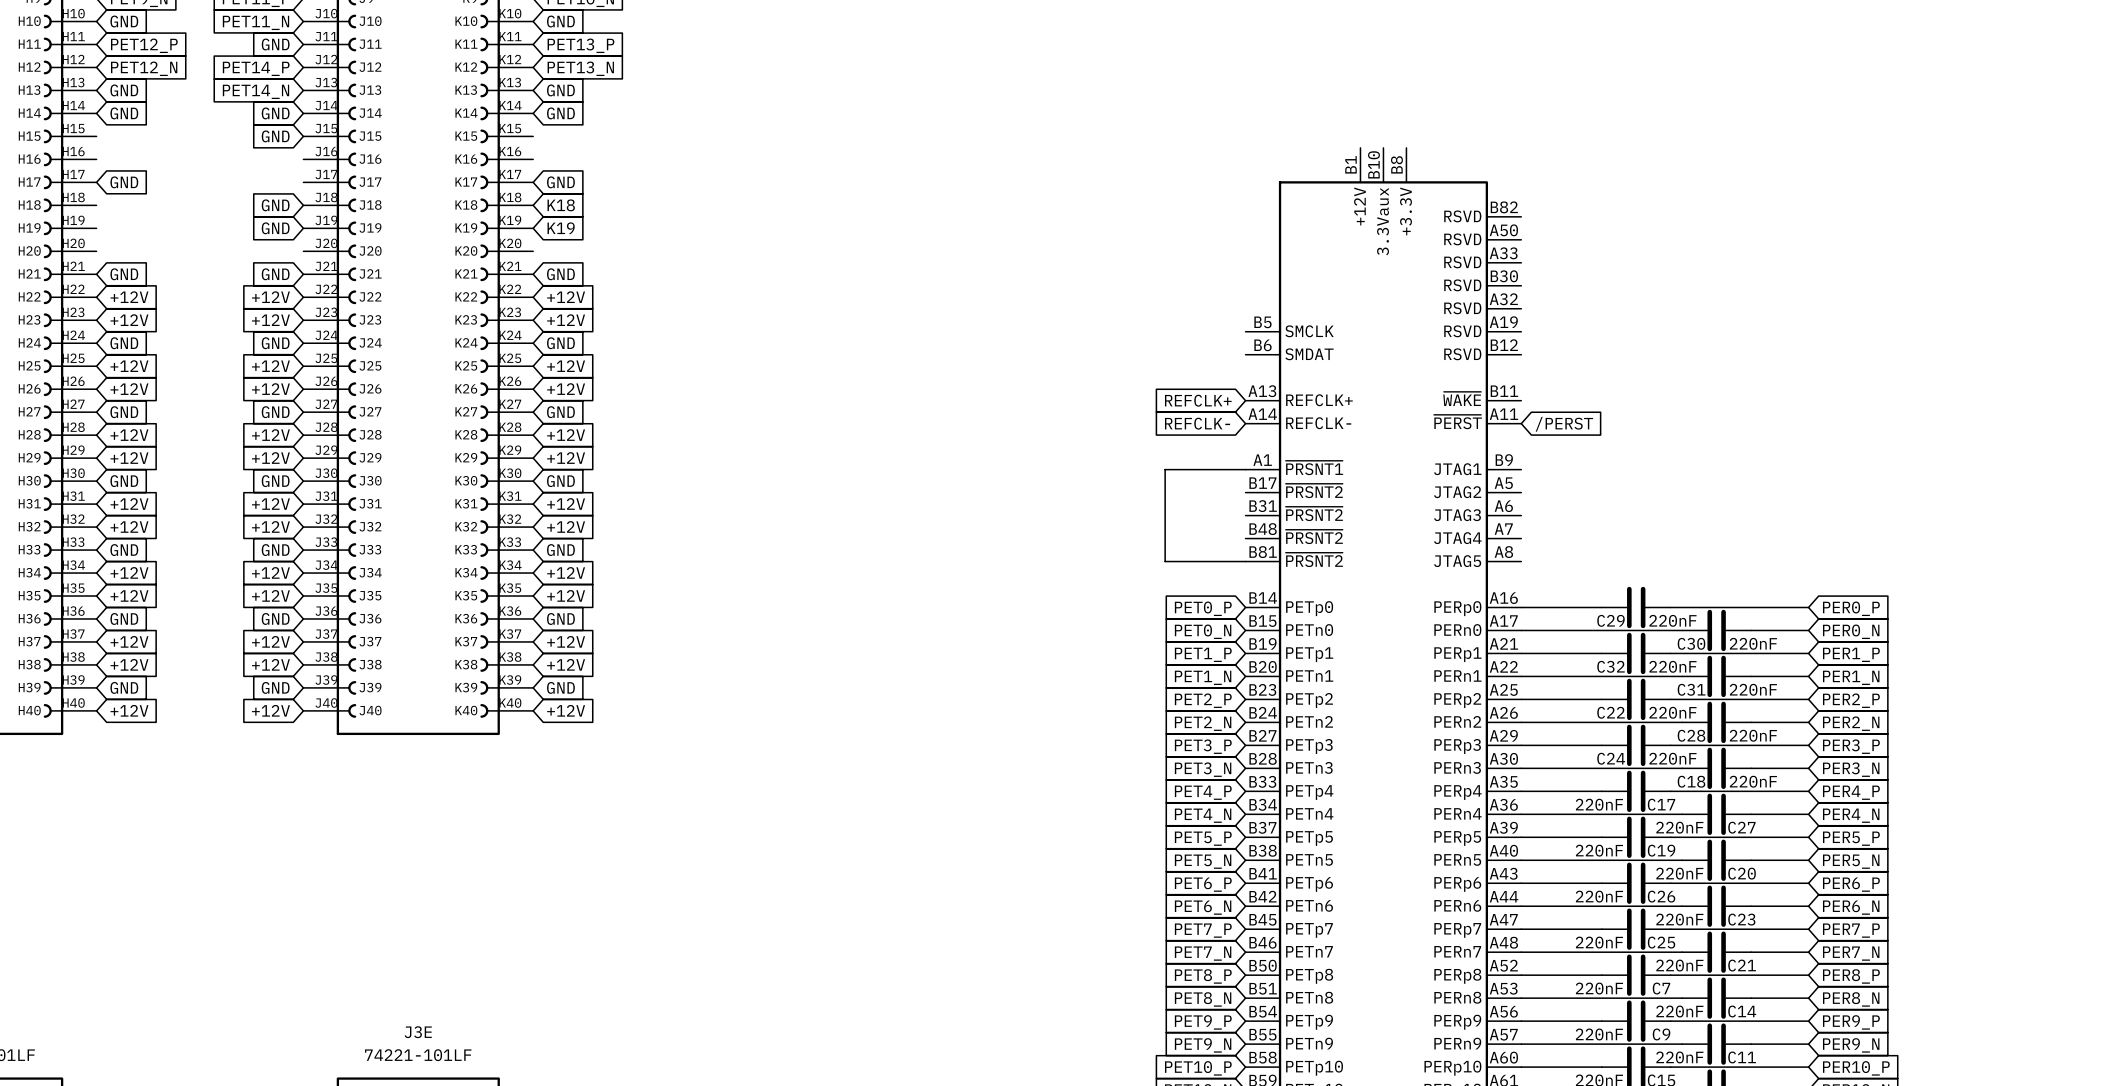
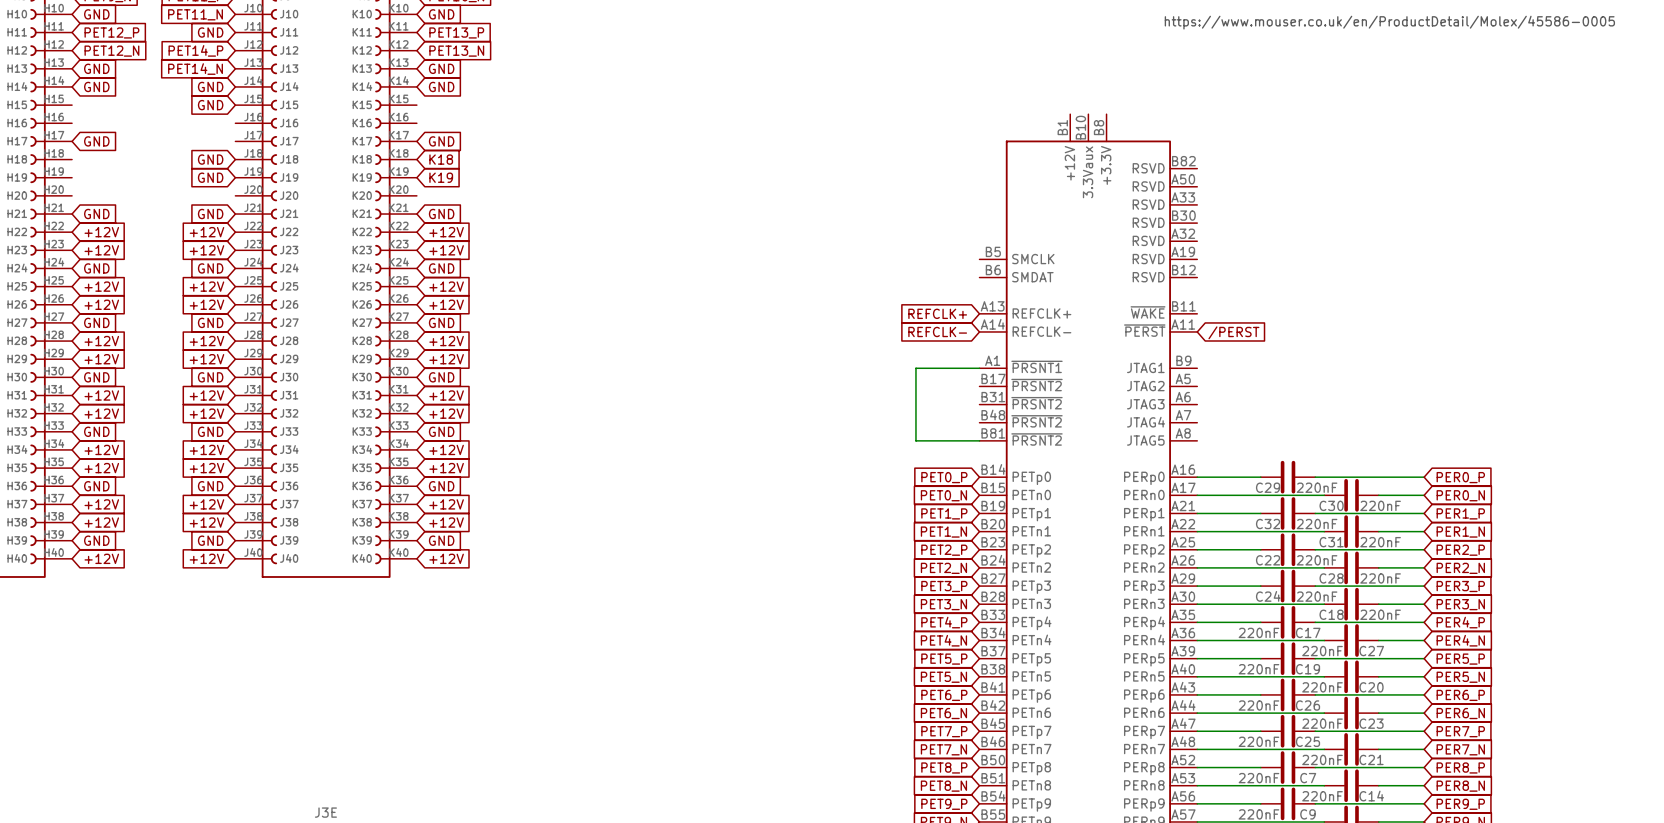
text: none -> https://www.mouser.co.uk/en/ProductDetail/Molex/45586-0005 (1389, 22)

